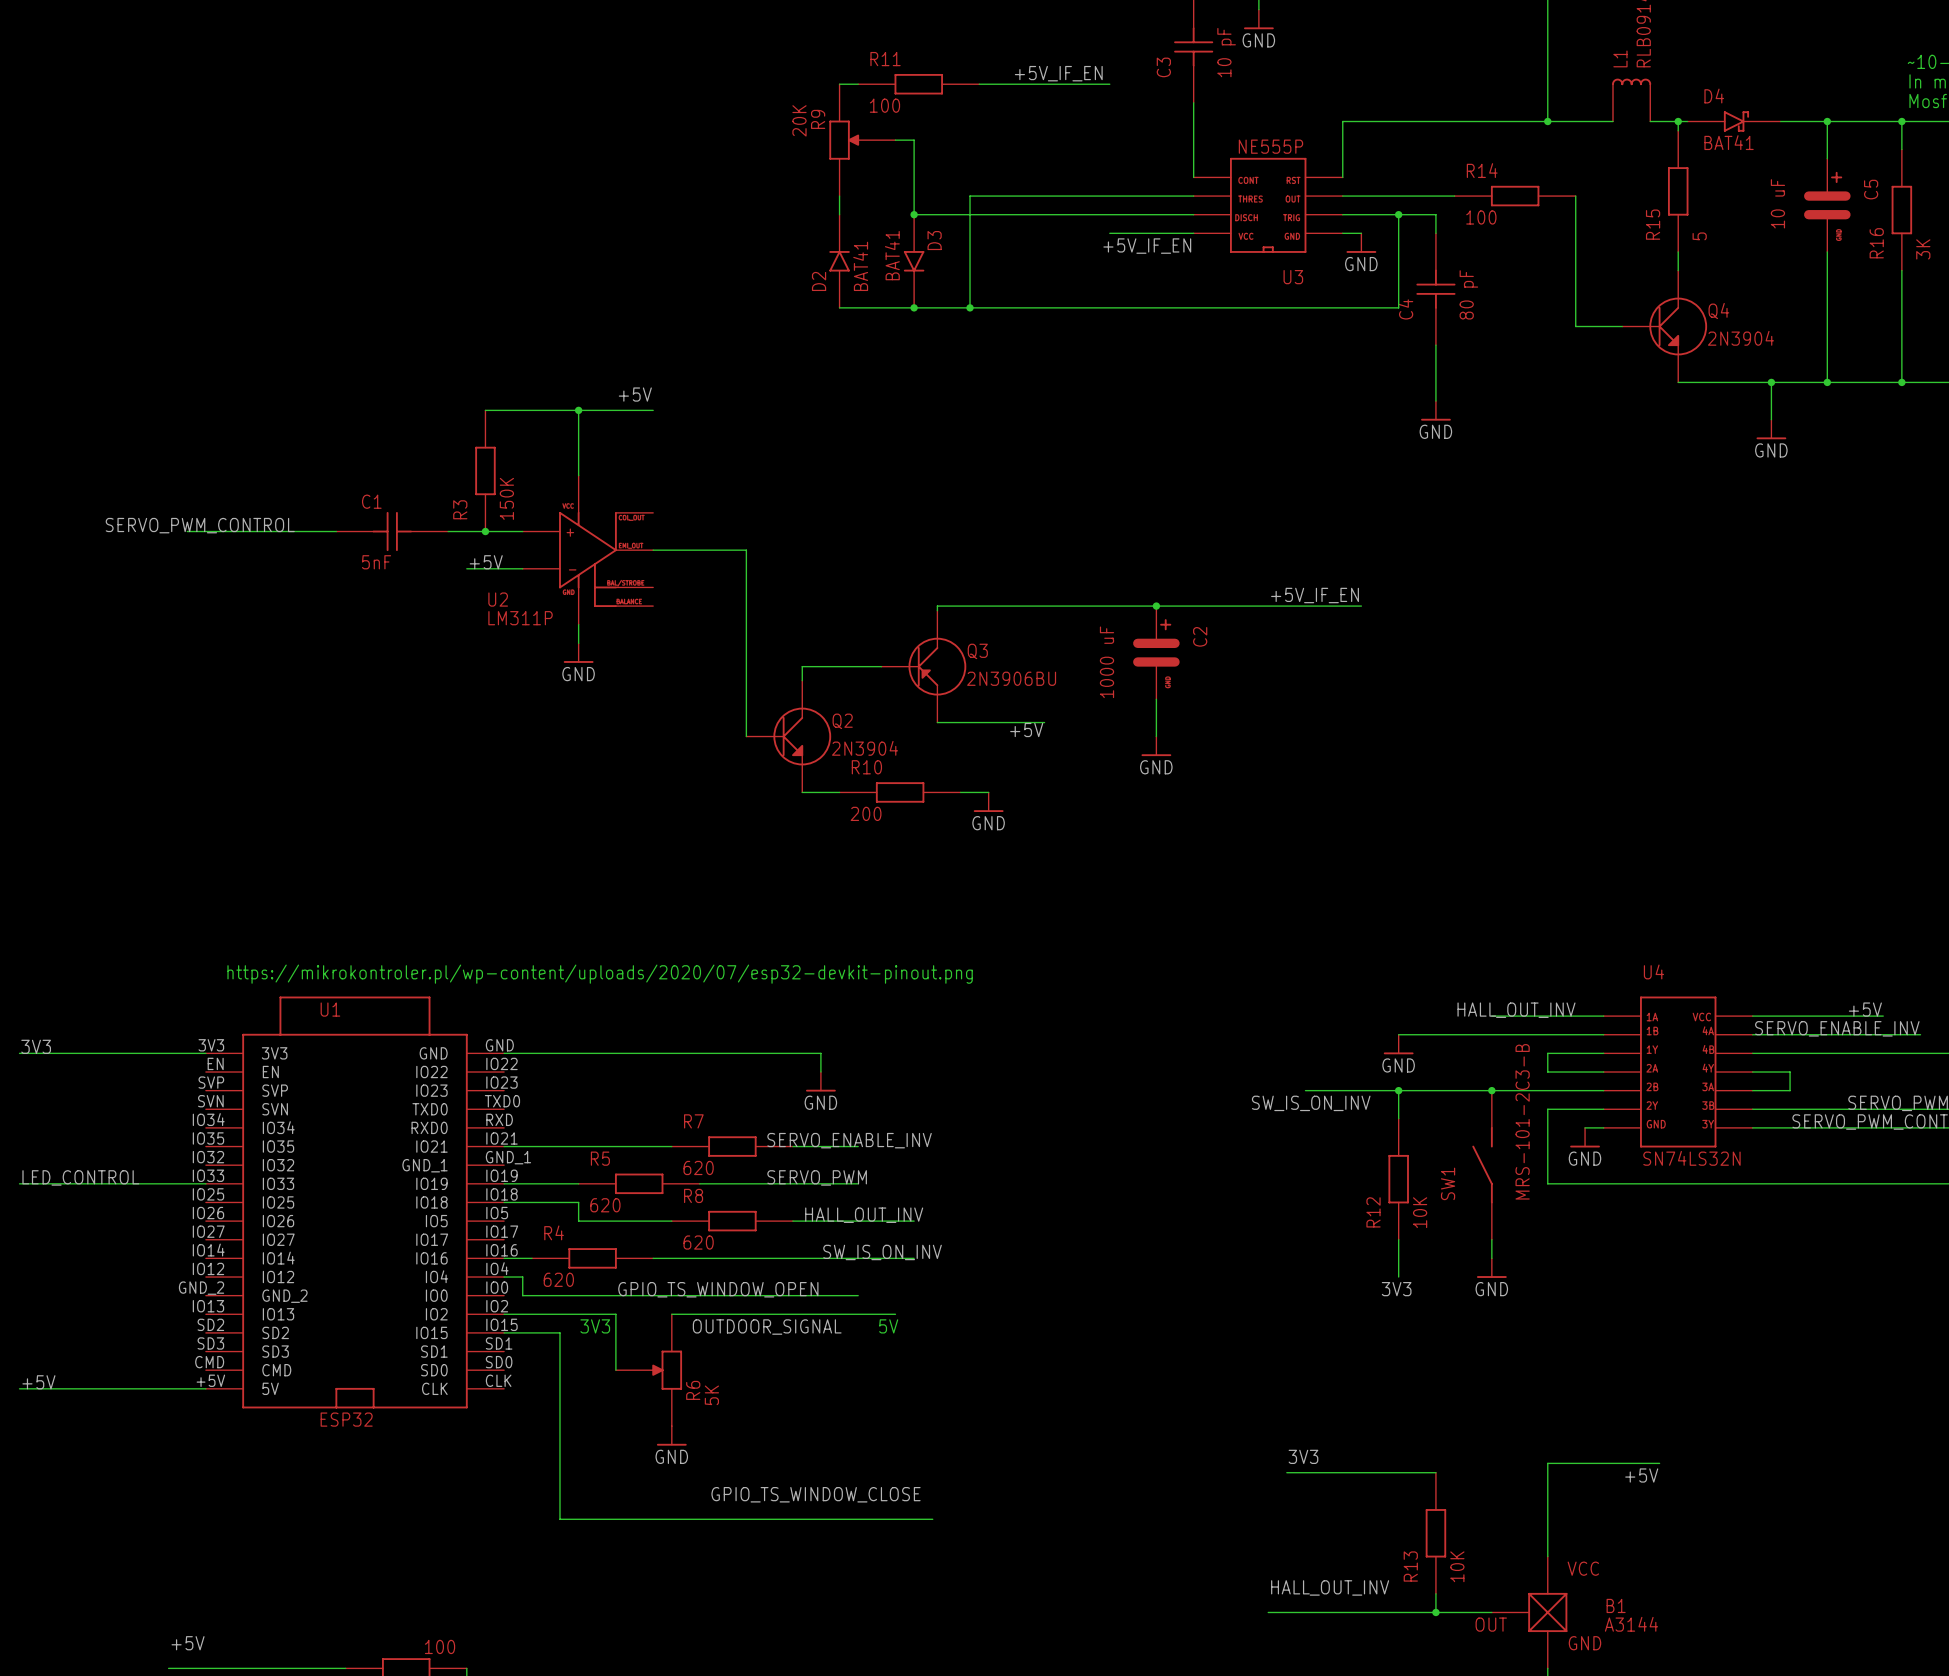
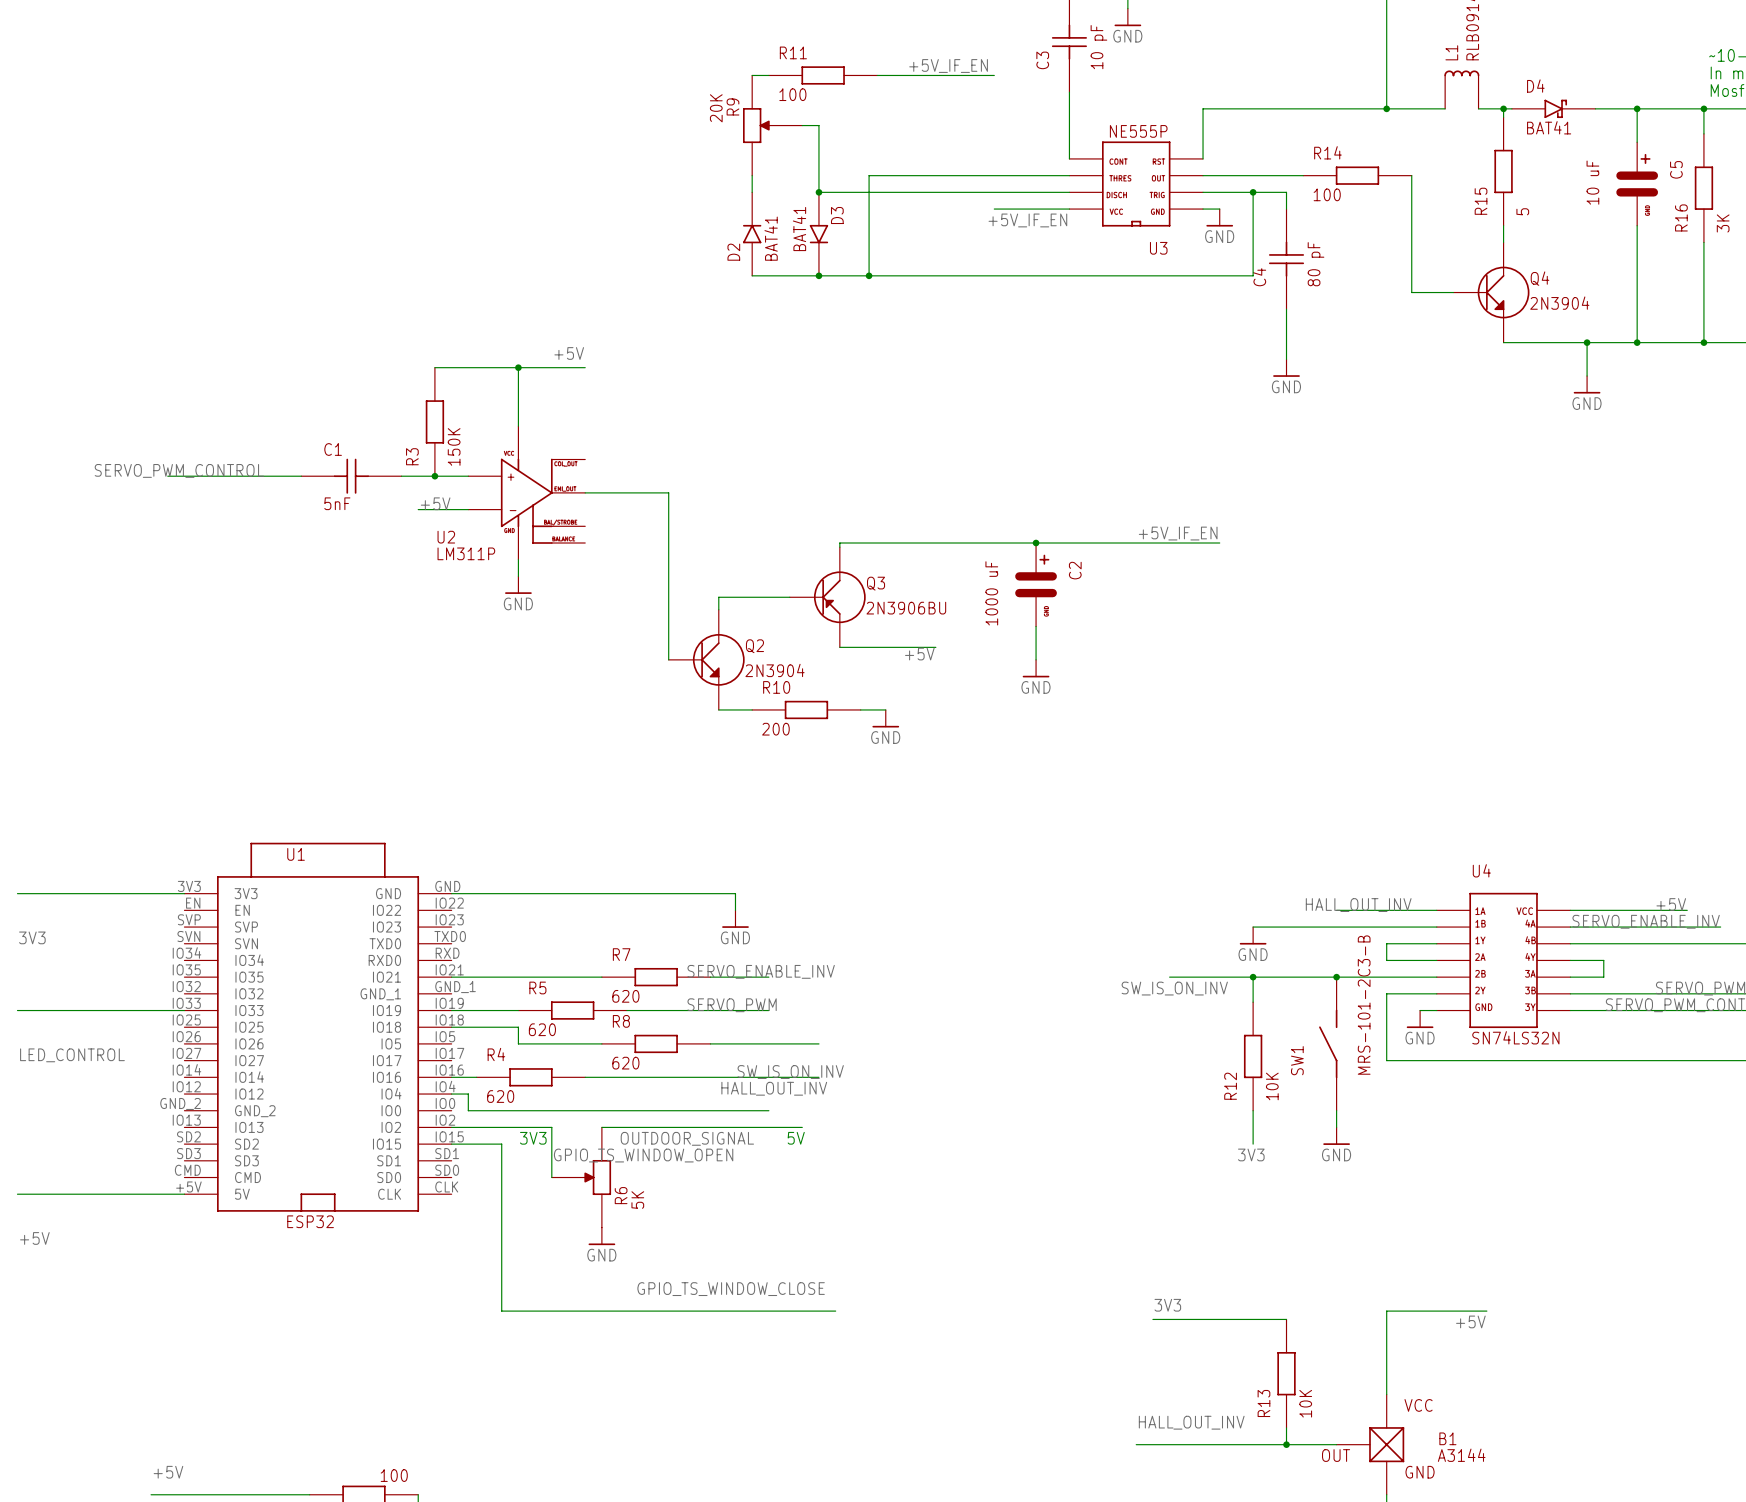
text: https://mikrokontroler.pl/wp-content/uploads/2020/07/esp32-devkit-pinout.png (600, 974) -> none
wire: (19, 1053) (205, 1053) -> (17, 893) (184, 893)
wire: (504, 1053) (820, 1053) (820, 1072) -> (451, 893) (735, 893) (735, 910)
power symbol position: GND (820, 1081) -> GND (735, 919)
wire: none -> (451, 977) (601, 977)
label position: SERVO_ENABLE_INV (849, 1140) -> SERVO_ENABLE_INV (761, 971)
wire: (578, 1146) (671, 1146) -> (518, 1027) (518, 1043) (601, 1043)
R7 position: (732, 1146) -> (656, 977)
wire: (792, 1146) (858, 1146) -> (710, 977) (768, 977)
label position: SERVO_PWM (817, 1177) -> SERVO_PWM (732, 1005)
wire: (19, 1183) (205, 1183) -> (17, 1010) (184, 1010)
wire: (504, 1183) (578, 1183) -> (451, 1010) (518, 1010)
R5 position: (639, 1183) -> (572, 1010)
wire: (699, 1183) (858, 1183) -> (626, 1010) (768, 1010)
U1 position: (354, 1202) -> (318, 1027)
wire: (532, 1202) (578, 1202) (578, 1221) (671, 1221) -> none
wire: none -> (585, 1077) (818, 1077)
wire: none -> (451, 1094) (468, 1094) (468, 1110) (768, 1110)
R8 position: (732, 1221) -> (656, 1043)
wire: (792, 1221) (914, 1221) -> (710, 1043) (818, 1043)
label position: SW_IS_ON_INV (882, 1252) -> SW_IS_ON_INV (790, 1072)
wire: none -> (476, 1127) (551, 1127) (551, 1177)
R4 position: (592, 1258) -> (530, 1077)
wire: (653, 1258) (671, 1258) -> none
wire: (895, 1258) (914, 1258) -> none
wire: (522, 1277) (522, 1295) (858, 1295) -> none
wire: (504, 1314) (615, 1314) (615, 1370) -> none
wire: (671, 1314) (895, 1314) -> none
text position: 3V3 (595, 1326) -> 3V3 (533, 1138)
text position: 5V (888, 1326) -> 5V (796, 1138)
label position: OUTDOOR_SIGNAL (767, 1327) -> OUTDOOR_SIGNAL (687, 1138)
wire: (504, 1332) (559, 1332) -> (468, 1144) (501, 1144) (501, 1194)
R6 position: (648, 1370) -> (581, 1177)
wire: (19, 1388) (205, 1388) -> (17, 1194) (184, 1194)
power symbol position: GND (671, 1435) -> GND (601, 1236)
wire: (559, 1463) (559, 1519) (932, 1519) -> (501, 1311) (835, 1311)
label position: GPIO_TS_WINDOW_CLOSE (816, 1494) -> GPIO_TS_WINDOW_CLOSE (731, 1289)

